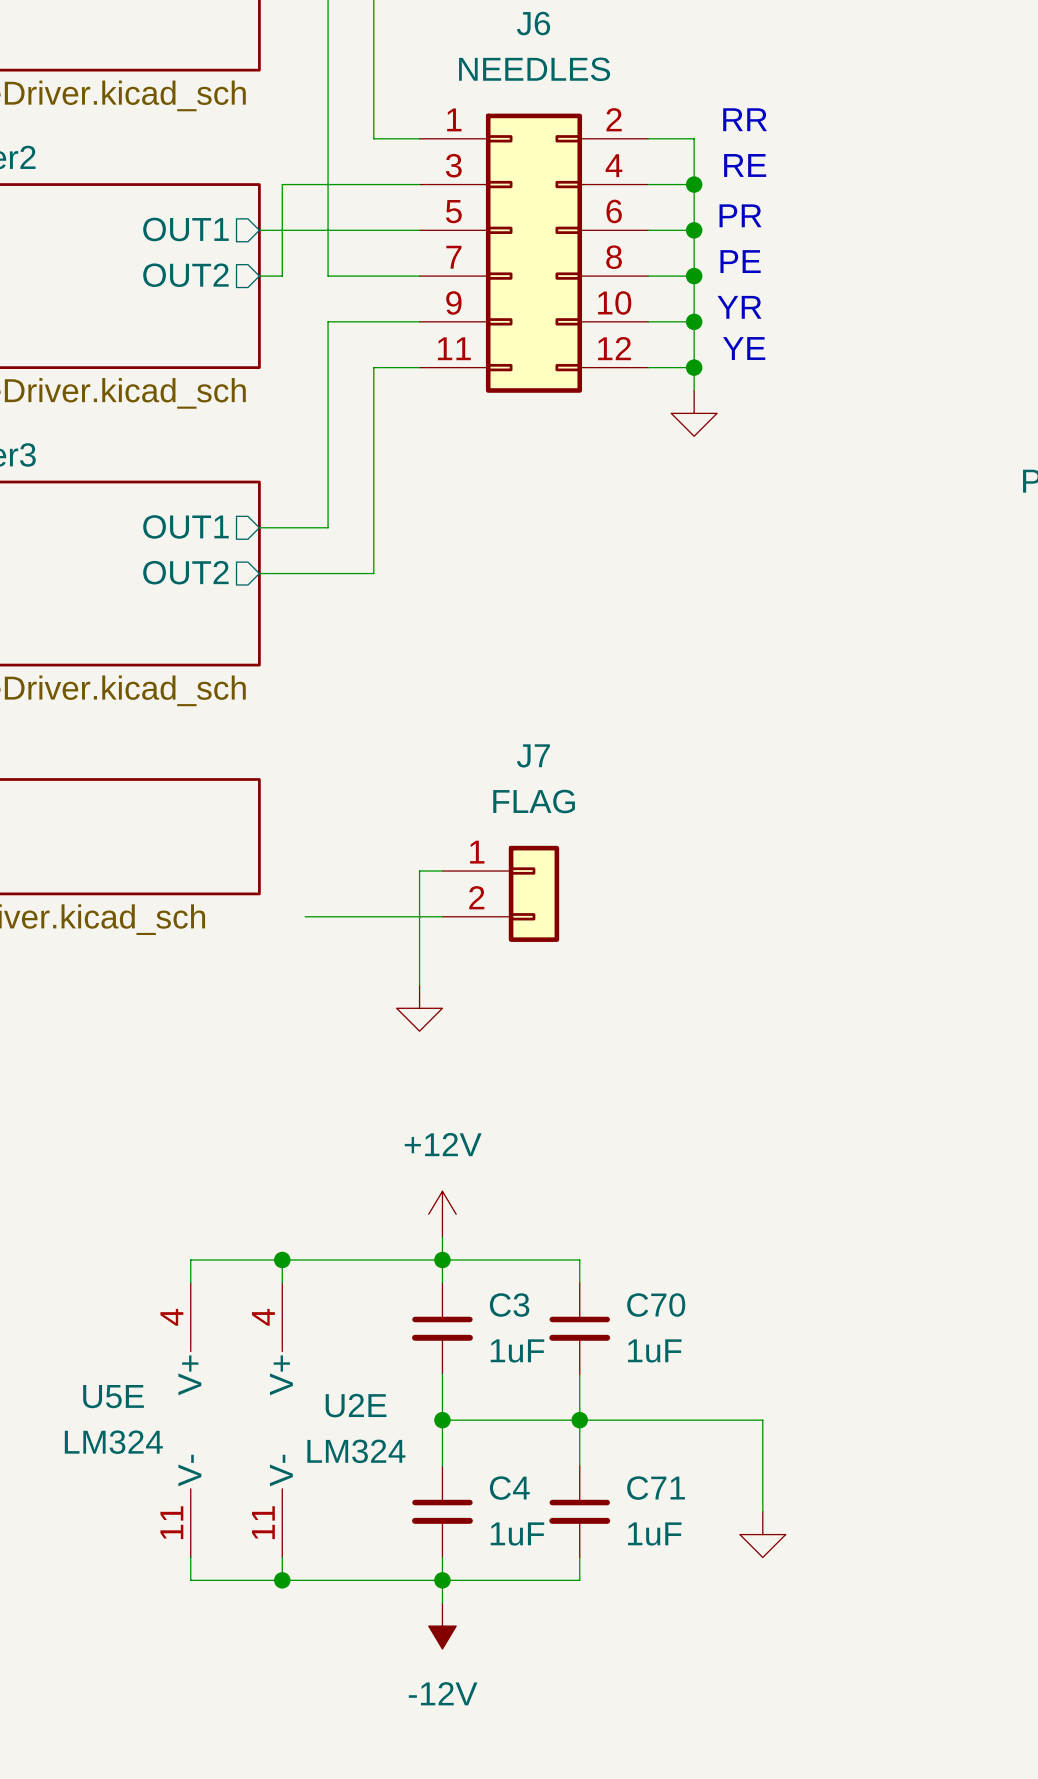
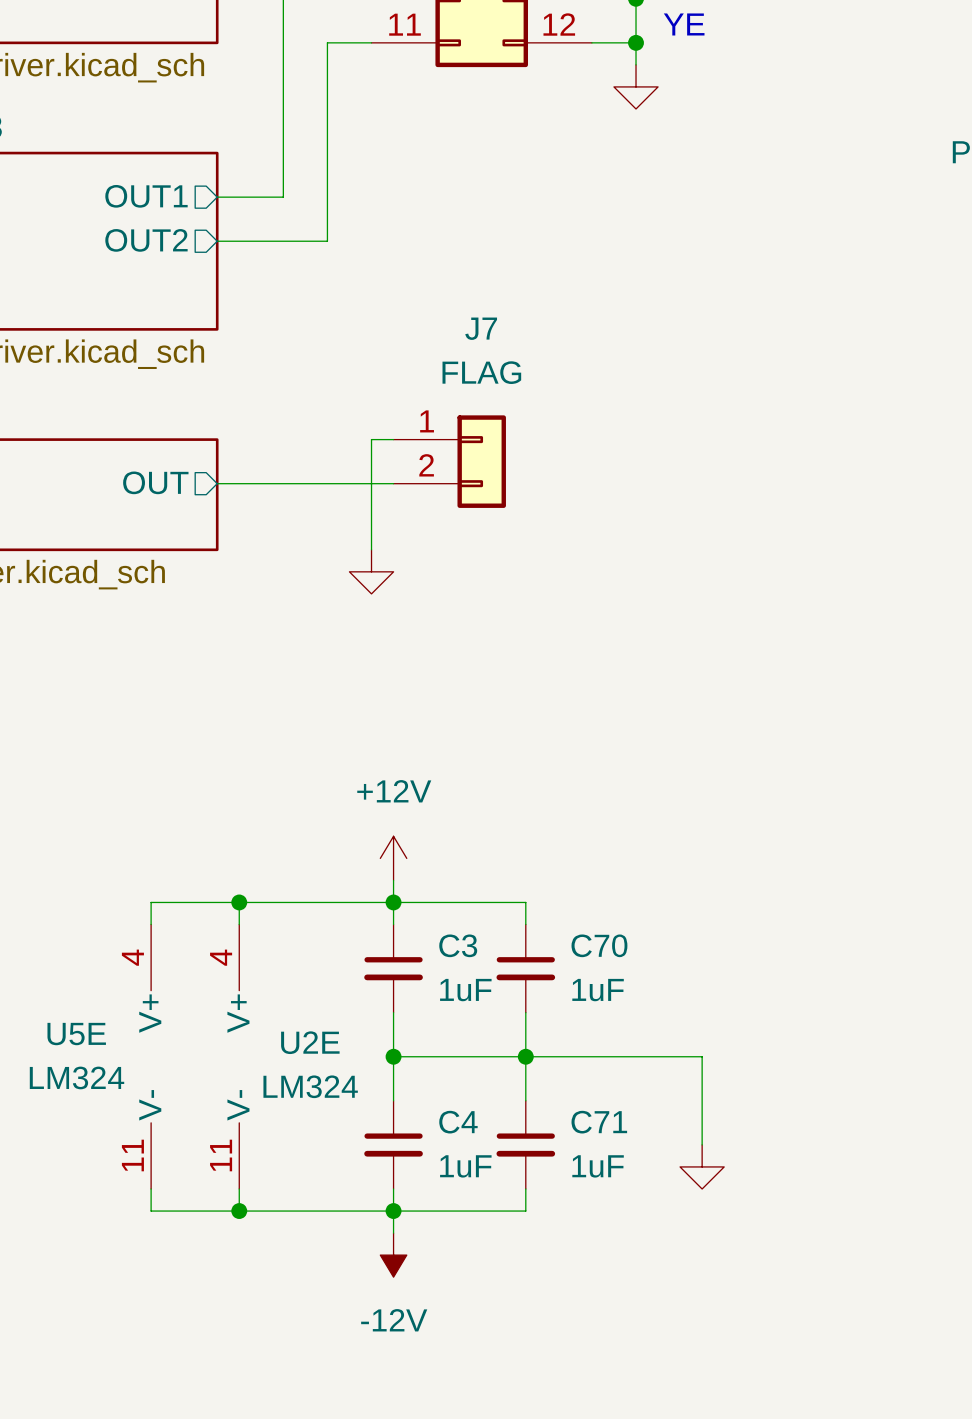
sheet pin: none -> OUT (155, 482)
wire: none -> (217, 483) (393, 483)
wire: (419, 871) (442, 871) -> (371, 527) (371, 439) (393, 439)
wire: (419, 893) (419, 985) -> none
J7 position: (500, 893) -> (449, 461)
wire: (305, 916) (442, 916) -> none
power symbol position: (419, 1008) -> (371, 571)

